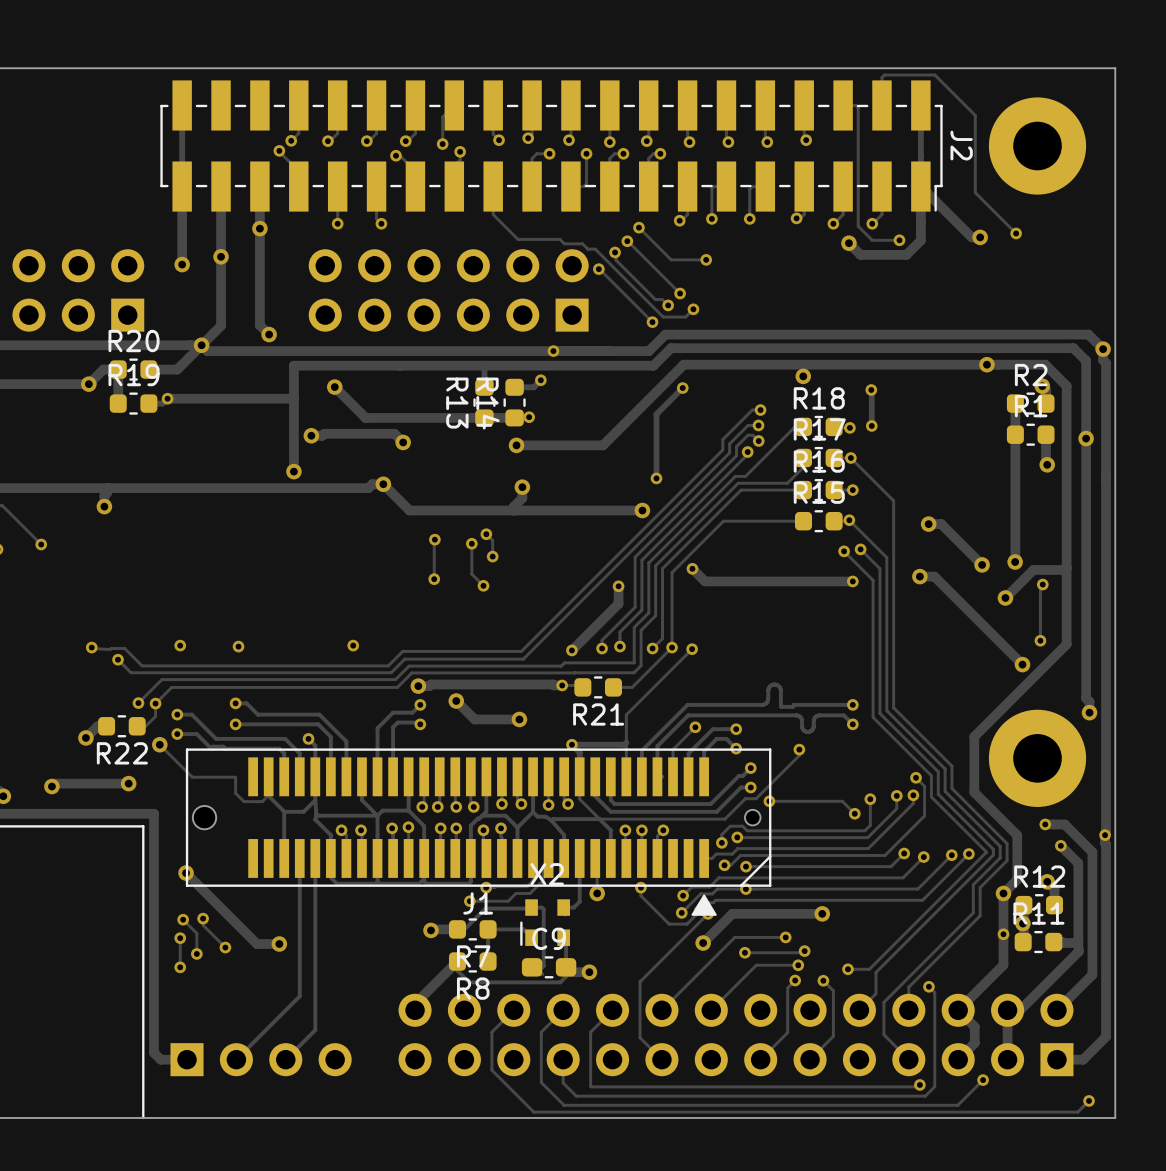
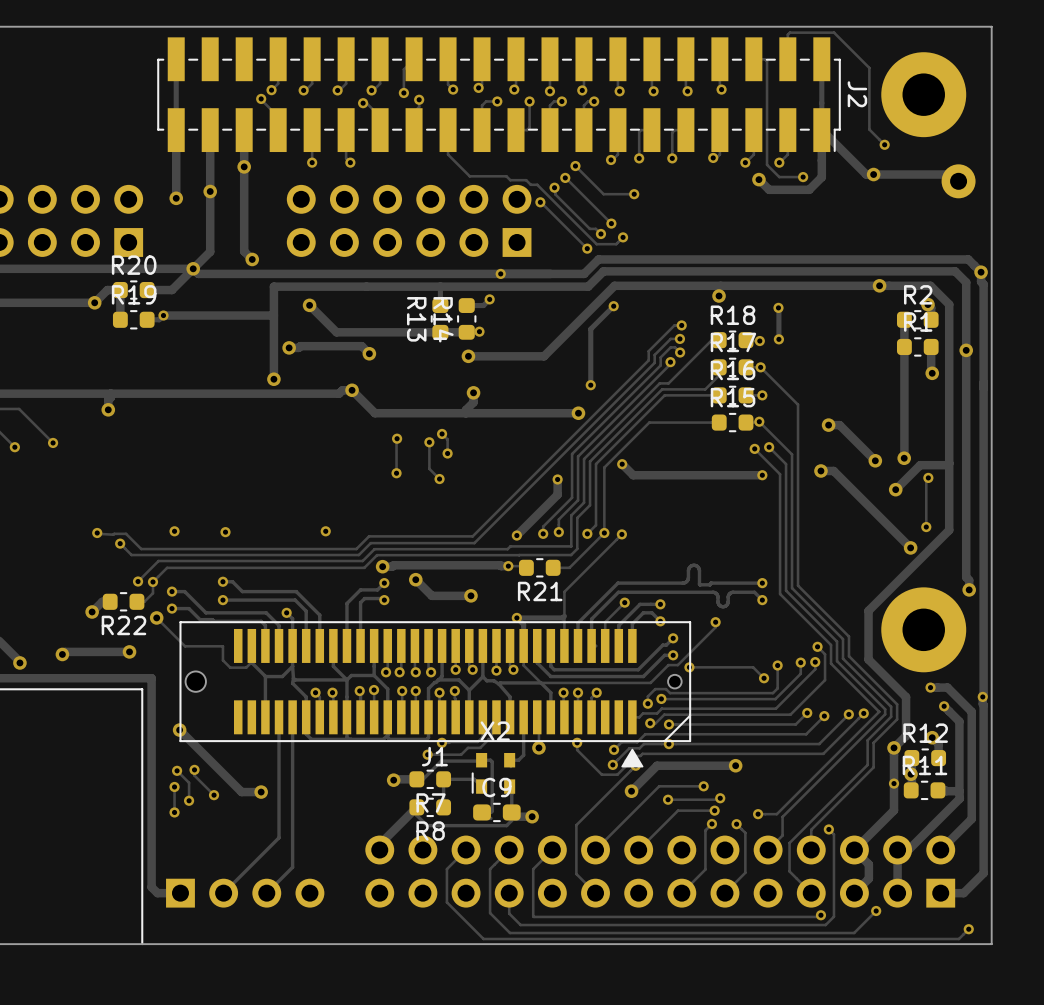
track: (975, 185) (975, 192) (1016, 233) -> (869, 129) (884, 144)
via position: (1016, 233) -> (884, 144)
track: none -> (873, 174) (951, 174) (958, 181)
part: none -> (958, 181)

